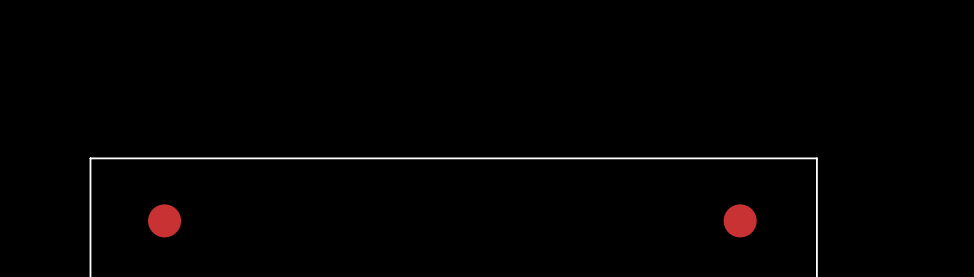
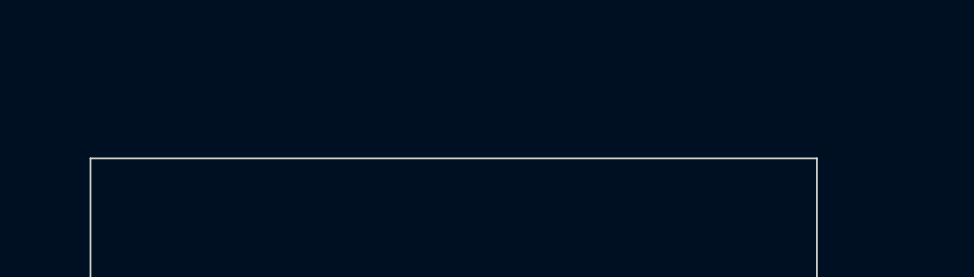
part: (164, 220) -> none
part: (740, 220) -> none

